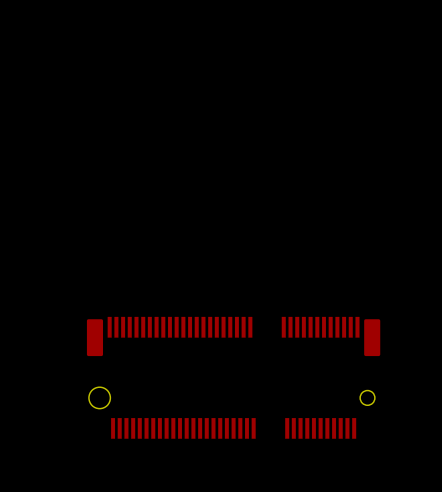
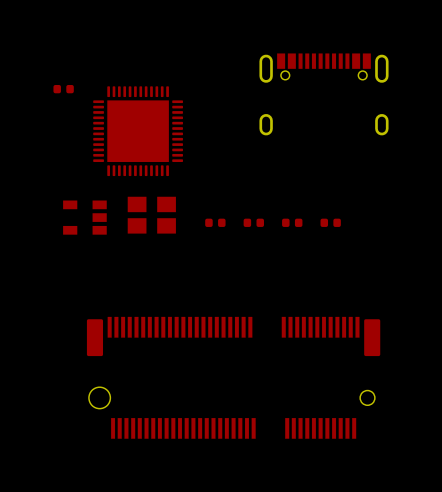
part: none -> (63, 89)
part: none -> (323, 94)
part: none -> (138, 131)
part: none -> (151, 215)
part: none -> (84, 217)
part: none -> (215, 222)
part: none -> (253, 222)
part: none -> (292, 222)
part: none -> (330, 222)

